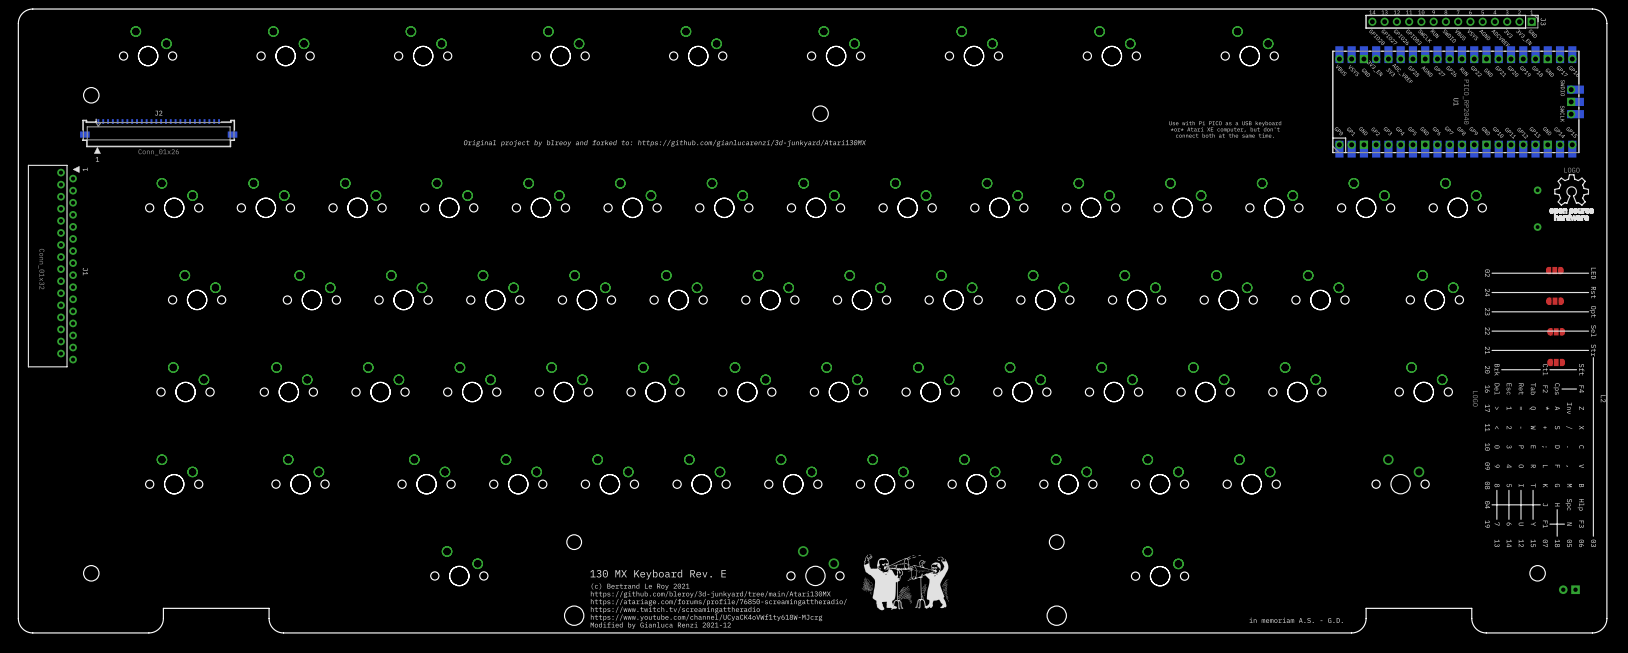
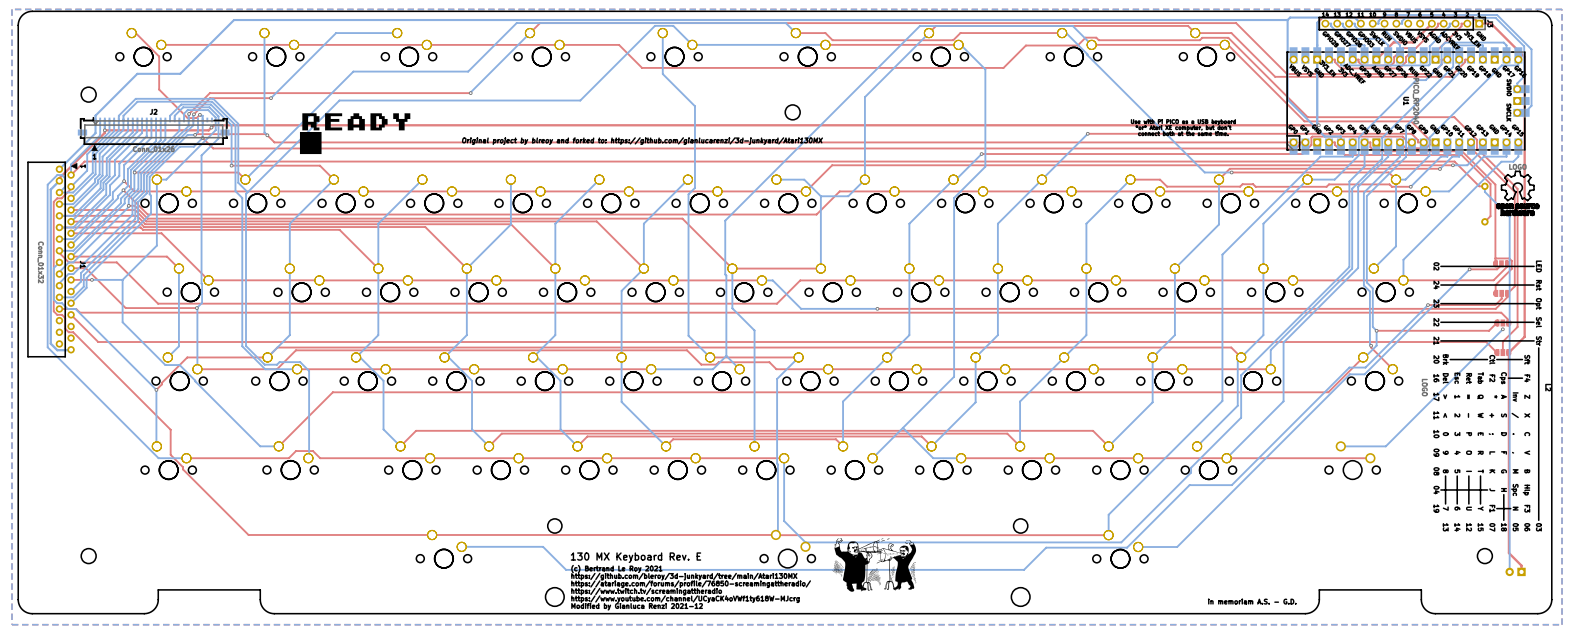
bottom zone outline: none -> (1562, 9) (1562, 624) (11, 624) (11, 9) (1562, 9)
bottom track: none -> (1287, 20) (1287, 99) (1324, 136) (1340, 136) (1340, 142)
bottom track: none -> (1287, 20) (1290, 17) (1354, 17) (1360, 23)
bottom track: none -> (1287, 20) (234, 20) (180, 73) (137, 73) (95, 115) (95, 133) (59, 169)
top track: none -> (1318, 21) (1322, 17) (1473, 17) (1479, 23) (1491, 23) (1524, 57) (1524, 336) (1508, 352) (1508, 553) (1521, 565) (1521, 571)
bottom track: none -> (1318, 21) (1317, 123) (1318, 125)
bottom track: none -> (1325, 23) (1331, 23) (1331, 26) (1350, 45) (1364, 45) (1364, 59)
bottom track: none -> (1337, 23) (1343, 23) (1343, 26) (1355, 38) (1381, 38) (1388, 45) (1388, 59)
bottom track: none -> (1349, 23) (1354, 23) (1358, 29) (1384, 29) (1400, 45) (1400, 59)
bottom track: none -> (1372, 23) (1378, 23) (1384, 15) (1497, 15) (1531, 49) (1531, 105) (1524, 112) (1517, 112)
bottom track: none -> (1396, 23) (1402, 23) (1405, 17) (1495, 17) (1524, 46) (1524, 76) (1517, 83) (1517, 89)
top track: none -> (1431, 23) (1413, 42) (1393, 42) (1376, 59)
top track: none -> (1443, 23) (1437, 23) (1437, 26) (1415, 48) (1403, 48) (1394, 57) (1394, 62) (1390, 65) (1362, 65) (1358, 59) (1352, 59)
bottom track: none -> (1455, 23) (1449, 23) (1449, 26) (1429, 46) (1428, 65) (1340, 65) (1340, 59)
top track: none -> (1467, 23) (1461, 23) (1461, 26) (1435, 52) (1410, 52) (1405, 57) (1405, 61) (1399, 68) (1341, 68) (1334, 59) (1329, 59)
top track: none -> (131, 33) (135, 33) (159, 56) (159, 89) (187, 118) (196, 118) (199, 114)
bottom track: none -> (264, 33) (264, 132) (267, 135)
bottom track: none -> (397, 33) (336, 33) (271, 98)
top track: none -> (530, 33) (539, 23) (1236, 23) (1287, 74) (1432, 74) (1441, 64) (1441, 59) (1447, 59)
bottom track: none -> (530, 33) (470, 93)
bottom track: none -> (662, 33) (662, 74) (694, 106) (694, 187) (688, 194) (688, 335) (710, 357)
bottom track: none -> (795, 33) (785, 23) (516, 23) (468, 71) (353, 71) (245, 179)
top track: none -> (928, 33) (936, 25) (1188, 25) (1195, 33) (1231, 33) (1275, 76) (1450, 76) (1465, 62) (1465, 59) (1471, 59)
bottom track: none -> (929, 33) (864, 97) (864, 179)
top track: none -> (1062, 33) (960, 33) (953, 40) (832, 40) (825, 33) (795, 33)
bottom track: none -> (1062, 33) (1066, 33) (1204, 172) (1231, 172)
top track: none -> (294, 44) (161, 44)
top track: none -> (426, 44) (294, 44)
top track: none -> (559, 44) (619, 44) (642, 67) (1003, 67) (1025, 45) (1077, 45) (1085, 37) (1096, 37) (1098, 40) (1199, 40) (1202, 37) (1228, 37) (1307, 117) (1454, 117) (1476, 139) (1476, 148) (1517, 188) (1517, 326) (1502, 341) (1502, 352)
top track: none -> (559, 44) (426, 44)
bottom track: none -> (692, 44) (673, 25) (654, 25) (580, 100) (339, 100) (246, 193) (246, 345) (264, 364) (300, 362) (309, 371) (308, 458)
bottom track: none -> (825, 44) (692, 44)
top track: none -> (958, 44) (825, 44)
bottom track: none -> (958, 44) (960, 44) (985, 69) (985, 166) (954, 197) (954, 376) (872, 458)
bottom track: none -> (1091, 44) (1072, 26) (919, 26) (725, 220) (726, 355)
top track: none -> (1224, 44) (1091, 44)
top track: none -> (1224, 44) (1228, 44) (1304, 121) (1411, 121) (1429, 140) (1429, 144) (1426, 148) (1405, 148) (1400, 142)
bottom track: none -> (1459, 59) (1459, 72) (1406, 126) (1406, 156) (1366, 196) (1366, 282) (1372, 288) (1372, 326) (1376, 330) (1376, 345) (1363, 357)
bottom track: none -> (1482, 59) (1482, 45) (1454, 45) (1453, 66) (1382, 137) (1382, 158) (1352, 188) (1352, 268) (1270, 350) (1270, 369)
bottom track: none -> (1506, 59) (1506, 45) (1503, 42) (1445, 42) (1441, 46) (1441, 64) (1425, 80) (1416, 80) (1358, 137) (1358, 155) (1334, 179) (1307, 179)
bottom track: none -> (1518, 59) (1518, 65) (1501, 65) (1429, 137) (1429, 155) (1405, 179) (1396, 179) (1396, 246) (1373, 268)
top track: none -> (470, 93) (209, 93) (189, 113)
via: none -> (470, 93)
top track: none -> (271, 98) (210, 98) (193, 114)
via: none -> (271, 98)
drawing: none -> [299, 113, 411, 155]
bottom track: none -> (189, 113) (188, 125) (141, 173) (141, 190) (132, 198) (132, 214) (73, 274) (68, 274) (59, 283) (59, 285)
via: none -> (189, 113)
bottom track: none -> (193, 114) (193, 125) (143, 174) (143, 192) (135, 200) (135, 218) (80, 273) (80, 281) (71, 291)
via: none -> (193, 114)
bottom track: none -> (199, 114) (202, 115) (202, 137) (193, 146) (179, 146) (149, 176) (151, 213) (86, 278) (86, 287) (71, 303)
via: none -> (199, 114)
bottom track: none -> (100, 119) (100, 135) (71, 164) (71, 175)
bottom track: none -> (104, 119) (104, 130)
bottom track: none -> (109, 119) (109, 131) (87, 154) (87, 170) (71, 186)
bottom track: none -> (114, 119) (114, 131) (92, 152) (92, 172) (73, 192) (59, 192) (65, 186) (65, 178) (61, 175) (57, 175) (47, 184) (47, 347) (158, 458) (186, 458)
bottom track: none -> (128, 119) (128, 131) (102, 156) (102, 175) (97, 180) (97, 183) (71, 210)
bottom track: none -> (132, 119) (132, 132) (106, 158) (106, 175) (100, 181) (100, 188) (73, 215) (59, 215)
bottom track: none -> (137, 119) (137, 131) (109, 159) (109, 176) (103, 182) (103, 189) (71, 221)
bottom track: none -> (142, 119) (142, 132) (114, 160) (114, 175) (106, 183) (106, 194) (73, 227) (59, 227)
bottom track: none -> (146, 119) (146, 136) (119, 163) (119, 176) (110, 185) (110, 194) (71, 233)
bottom track: none -> (151, 119) (151, 137) (124, 165) (124, 181) (112, 192) (112, 199) (73, 239) (59, 239)
bottom track: none -> (156, 119) (156, 141) (127, 169) (127, 186) (71, 244)
bottom track: none -> (160, 119) (160, 140) (130, 170) (130, 188) (120, 198) (120, 203) (73, 250) (59, 250)
bottom track: none -> (165, 119) (165, 139) (134, 170) (134, 189) (124, 198) (124, 203) (71, 256)
bottom track: none -> (170, 119) (170, 115) (181, 104) (210, 104) (231, 125) (231, 165)
bottom track: none -> (174, 119) (174, 115) (183, 107) (209, 107) (218, 116) (218, 138) (201, 155) (202, 302) (196, 308) (197, 369)
bottom track: none -> (179, 119) (179, 130) (138, 171) (138, 189) (128, 198) (128, 206) (73, 262) (68, 262) (59, 274)
bottom track: none -> (184, 119) (184, 113) (187, 110) (208, 110) (215, 117) (215, 130) (166, 179) (156, 179) (156, 245) (122, 279)
bottom track: none -> (198, 119) (198, 132) (195, 134) (187, 134) (146, 175) (146, 193) (138, 202) (138, 220) (83, 275) (83, 286) (73, 297) (59, 297)
top track: none -> (1318, 125) (213, 125) (208, 130) (104, 130) (104, 132) (59, 178) (59, 180)
via: none -> (1318, 125)
via: none -> (211, 127)
via: none -> (104, 130)
top track: none -> (1087, 133) (1411, 133) (1417, 142) (1423, 142)
bottom track: none -> (1087, 133) (1041, 179)
via: none -> (1087, 133)
top track: none -> (195, 134) (266, 134) (274, 142) (1293, 142)
via: none -> (195, 134)
via: none -> (267, 135)
top track: none -> (202, 137) (213, 148) (1295, 148) (1299, 142) (1305, 142)
via: none -> (202, 137)
top track: none -> (1329, 142) (1334, 142) (1334, 144) (1345, 154) (1461, 154) (1490, 183) (1490, 216) (1484, 221)
bottom track: none -> (1352, 142) (1352, 156) (1320, 156) (1222, 254) (1222, 400) (1108, 514) (1108, 535)
top track: none -> (1364, 142) (1370, 142) (1370, 147) (1374, 151) (1462, 151) (1495, 184) (1495, 263)
bottom track: none -> (1364, 142) (1364, 166) (1349, 181) (1349, 267) (1241, 375) (1241, 417) (1191, 467) (1191, 472) (1121, 542) (805, 542)
bottom track: none -> (1388, 142) (1388, 156) (1358, 186) (1358, 267) (1283, 342) (1283, 401) (1226, 458)
bottom track: none -> (1400, 142) (1400, 156) (1363, 192) (1363, 285) (1369, 291) (1371, 345)
top track: none -> (1411, 142) (1406, 142) (1402, 136) (1312, 136) (1311, 144) (1302, 154) (981, 154)
bottom track: none -> (1447, 142) (1447, 156) (1440, 156) (1410, 186)
bottom track: none -> (1459, 142) (1459, 156) (1452, 156) (1439, 169)
top track: none -> (1471, 142) (1471, 148) (1514, 191) (1514, 286) (1495, 308) (877, 308)
bottom track: none -> (1482, 142) (1482, 149) (1467, 165) (1452, 165)
bottom track: none -> (1506, 142) (1506, 156) (1483, 156) (1449, 191) (1425, 191)
bottom track: none -> (1518, 142) (1518, 156) (1513, 161) (1501, 161) (1403, 259) (1403, 280)
bottom track: none -> (981, 154) (956, 179) (953, 179)
via: none -> (981, 154)
top track: none -> (231, 165) (319, 165) (333, 179)
via: none -> (231, 165)
top track: none -> (1452, 165) (832, 165) (806, 191) (134, 191) (124, 181)
via: none -> (1452, 165)
top track: none -> (1439, 169) (1229, 168) (1218, 179)
via: none -> (1439, 169)
top track: none -> (134, 172) (238, 172) (245, 179)
via: none -> (134, 172)
top track: none -> (1231, 172) (1388, 172) (1396, 179)
via: none -> (1231, 172)
top track: none -> (71, 175) (84, 161) (1454, 161) (1479, 186) (1484, 186)
bottom track: none -> (333, 179) (289, 223) (289, 335) (267, 357)
bottom track: none -> (422, 179) (378, 223) (378, 335) (358, 355)
bottom track: none -> (510, 179) (510, 224) (466, 268) (466, 335) (446, 355)
bottom track: none -> (599, 179) (555, 223) (555, 335) (535, 355)
bottom track: none -> (687, 179) (643, 223) (643, 268) (621, 290) (621, 401) (666, 446)
bottom track: none -> (776, 179) (804, 179) (820, 196)
bottom track: none -> (864, 179) (848, 196) (820, 196)
bottom track: none -> (953, 179) (909, 223) (909, 335) (887, 357)
bottom track: none -> (1041, 179) (997, 223) (997, 335) (975, 357) (975, 402) (931, 446)
top track: none -> (1130, 179) (1160, 179) (1167, 186) (1240, 186) (1242, 184) (1253, 184) (1255, 186) (1326, 186) (1328, 184) (1389, 184) (1391, 186) (1410, 186)
bottom track: none -> (1130, 179) (1086, 223) (1086, 335) (1064, 357)
bottom track: none -> (1218, 179) (1218, 224) (1174, 268) (1174, 335) (1152, 357) (1152, 402) (1108, 446)
bottom track: none -> (1307, 179) (1263, 223) (1263, 335) (1241, 357)
bottom track: none -> (59, 180) (50, 189) (50, 343) (57, 350) (71, 349)
via: none -> (124, 181)
top track: none -> (71, 186) (61, 198) (57, 198) (53, 201) (53, 311) (65, 318) (65, 328) (68, 332) (73, 332) (170, 429) (170, 454) (248, 534) (775, 534)
via: none -> (1410, 186)
bottom track: none -> (1484, 186) (1484, 191) (1509, 216) (1509, 571)
top track: none -> (123, 190) (147, 214) (816, 214) (839, 191) (1425, 191)
via: none -> (123, 190)
bottom track: none -> (247, 192) (238, 182) (238, 123) (213, 98) (135, 98) (118, 115) (118, 130) (95, 153) (95, 174) (71, 198)
bottom track: none -> (820, 196) (820, 268)
bottom track: none -> (59, 204) (73, 204) (95, 182) (95, 179) (99, 174) (99, 153) (123, 129) (123, 115) (137, 101) (212, 101) (235, 125) (235, 191) (242, 197) (242, 346) (265, 369) (297, 369)
top track: none -> (128, 205) (134, 205) (147, 218) (682, 218) (732, 268) (820, 268)
via: none -> (128, 205)
top track: none -> (71, 210) (135, 210) (146, 221) (596, 221) (643, 268)
top track: none -> (59, 215) (136, 215) (145, 224) (511, 224) (555, 268)
top track: none -> (71, 221) (138, 221) (144, 227) (425, 227) (466, 268)
top track: none -> (59, 227) (140, 227) (143, 229) (339, 229) (378, 268)
top track: none -> (71, 233) (161, 233) (208, 280) (584, 280)
top track: none -> (59, 250) (68, 262) (116, 262) (158, 303) (777, 303) (800, 280) (850, 280)
top track: none -> (71, 256) (166, 256) (178, 268)
top track: none -> (1495, 258) (1509, 258) (1511, 260) (1511, 268) (1495, 284) (1495, 293)
bottom track: none -> (59, 262) (53, 268) (53, 299) (57, 303) (61, 303) (67, 309) (75, 309) (156, 389) (156, 446)
top track: none -> (1501, 263) (1497, 269) (1469, 269)
top track: none -> (1507, 263) (1507, 266) (1493, 280) (1403, 280)
top track: none -> (71, 268) (85, 268) (125, 308) (196, 308)
bottom track: none -> (178, 268) (178, 346) (167, 357)
bottom track: none -> (732, 268) (732, 308) (754, 330) (754, 446)
bottom track: none -> (1469, 269) (1364, 374) (1349, 374) (1177, 547) (1138, 547)
via: none -> (1469, 269)
top track: none -> (91, 279) (71, 279)
via: none -> (91, 279)
bottom track: none -> (122, 279) (91, 279)
bottom track: none -> (122, 279) (122, 322) (165, 365) (179, 365) (260, 446) (278, 446)
top track: none -> (673, 280) (584, 280)
top track: none -> (761, 280) (673, 280)
bottom track: none -> (761, 280) (772, 280) (801, 308) (877, 308)
top track: none -> (1403, 280) (850, 280)
top track: none -> (1501, 293) (1501, 298) (1495, 305) (1428, 305)
bottom track: none -> (1428, 305) (1365, 367) (1349, 367) (1231, 485) (1189, 485) (1127, 547) (1046, 547) (1024, 569) (566, 569) (543, 546) (461, 546)
via: none -> (1428, 305)
via: none -> (196, 308)
top track: none -> (59, 309) (76, 309) (79, 312) (1501, 312) (1508, 320) (1508, 322)
via: none -> (877, 308)
top track: none -> (71, 314) (98, 342) (1486, 342) (1496, 352)
top track: none -> (1496, 322) (1489, 330) (1376, 330)
bottom track: none -> (1502, 329) (1385, 446) (1340, 446)
via: none -> (1502, 329)
via: none -> (1376, 330)
top track: none -> (1371, 345) (1392, 369)
via: none -> (1371, 345)
bottom track: none -> (358, 355) (383, 380) (383, 429) (400, 446)
bottom track: none -> (446, 355) (472, 380) (472, 429) (489, 446)
bottom track: none -> (535, 355) (560, 380) (560, 429) (577, 446)
bottom track: none -> (726, 355) (739, 369)
bottom track: none -> (726, 355) (712, 369) (651, 369)
top track: none -> (267, 357) (187, 357) (156, 389)
top track: none -> (798, 357) (710, 357)
bottom track: none -> (798, 357) (777, 378) (777, 532) (775, 534)
bottom track: none -> (887, 357) (843, 401) (843, 446)
bottom track: none -> (1064, 357) (1020, 401) (1020, 446)
top track: none -> (1241, 357) (1231, 347) (277, 347) (267, 357)
bottom track: none -> (1241, 357) (1237, 360) (1237, 405) (1197, 446)
top track: none -> (1363, 357) (1328, 392) (332, 392) (278, 446)
top track: none -> (651, 369) (297, 369)
top track: none -> (1270, 369) (776, 369) (769, 362) (718, 362) (716, 364) (701, 364) (687, 350) (295, 350) (277, 369) (197, 369)
via: none -> (156, 389)
bottom track: none -> (902, 427) (933, 458) (961, 458)
top track: none -> (843, 446) (835, 439) (673, 439) (666, 446)
top track: none -> (931, 446) (921, 436) (587, 436) (577, 446)
top track: none -> (1020, 446) (1007, 433) (501, 433) (489, 446)
top track: none -> (1108, 446) (1093, 430) (416, 430) (400, 446)
top track: none -> (784, 458) (320, 458) (312, 451) (296, 451) (288, 458) (186, 458)
bottom track: none -> (784, 458) (784, 521) (805, 542)
top track: none -> (1370, 458) (961, 458)
top track: none -> (775, 534) (1108, 535)

